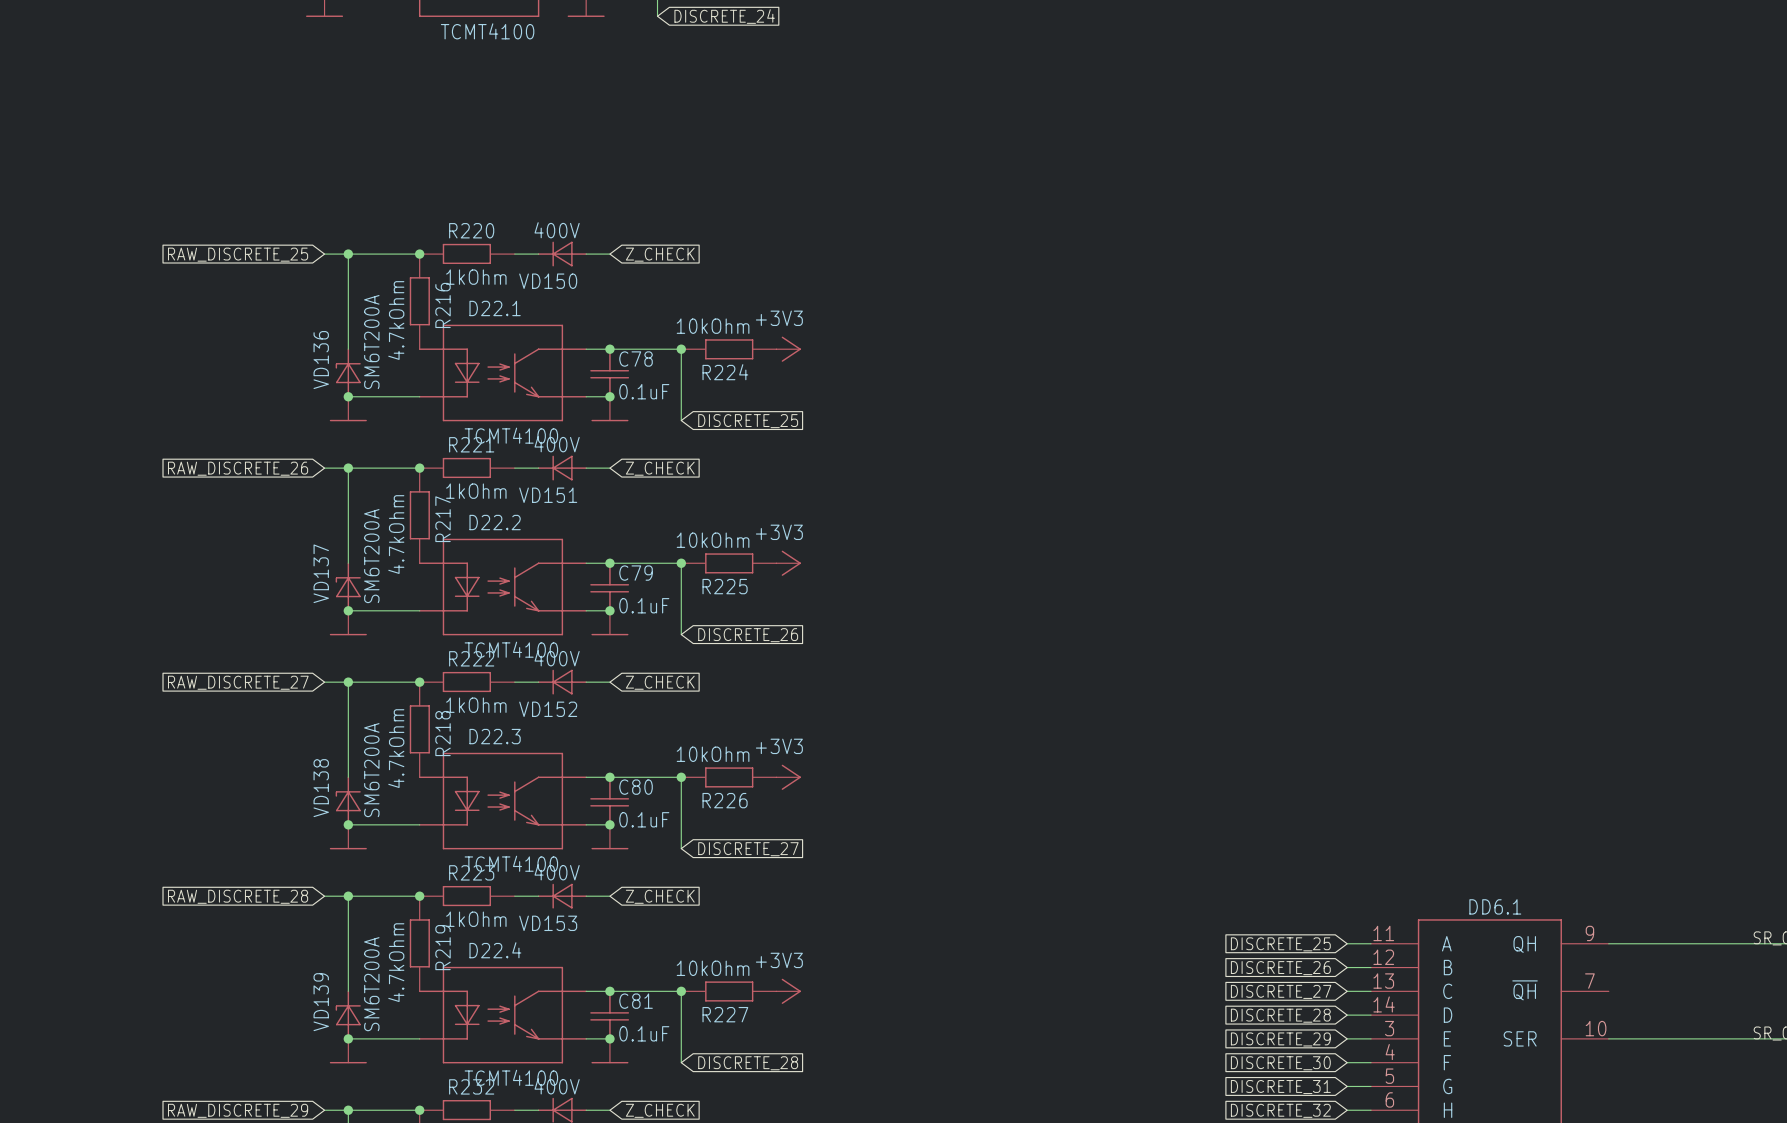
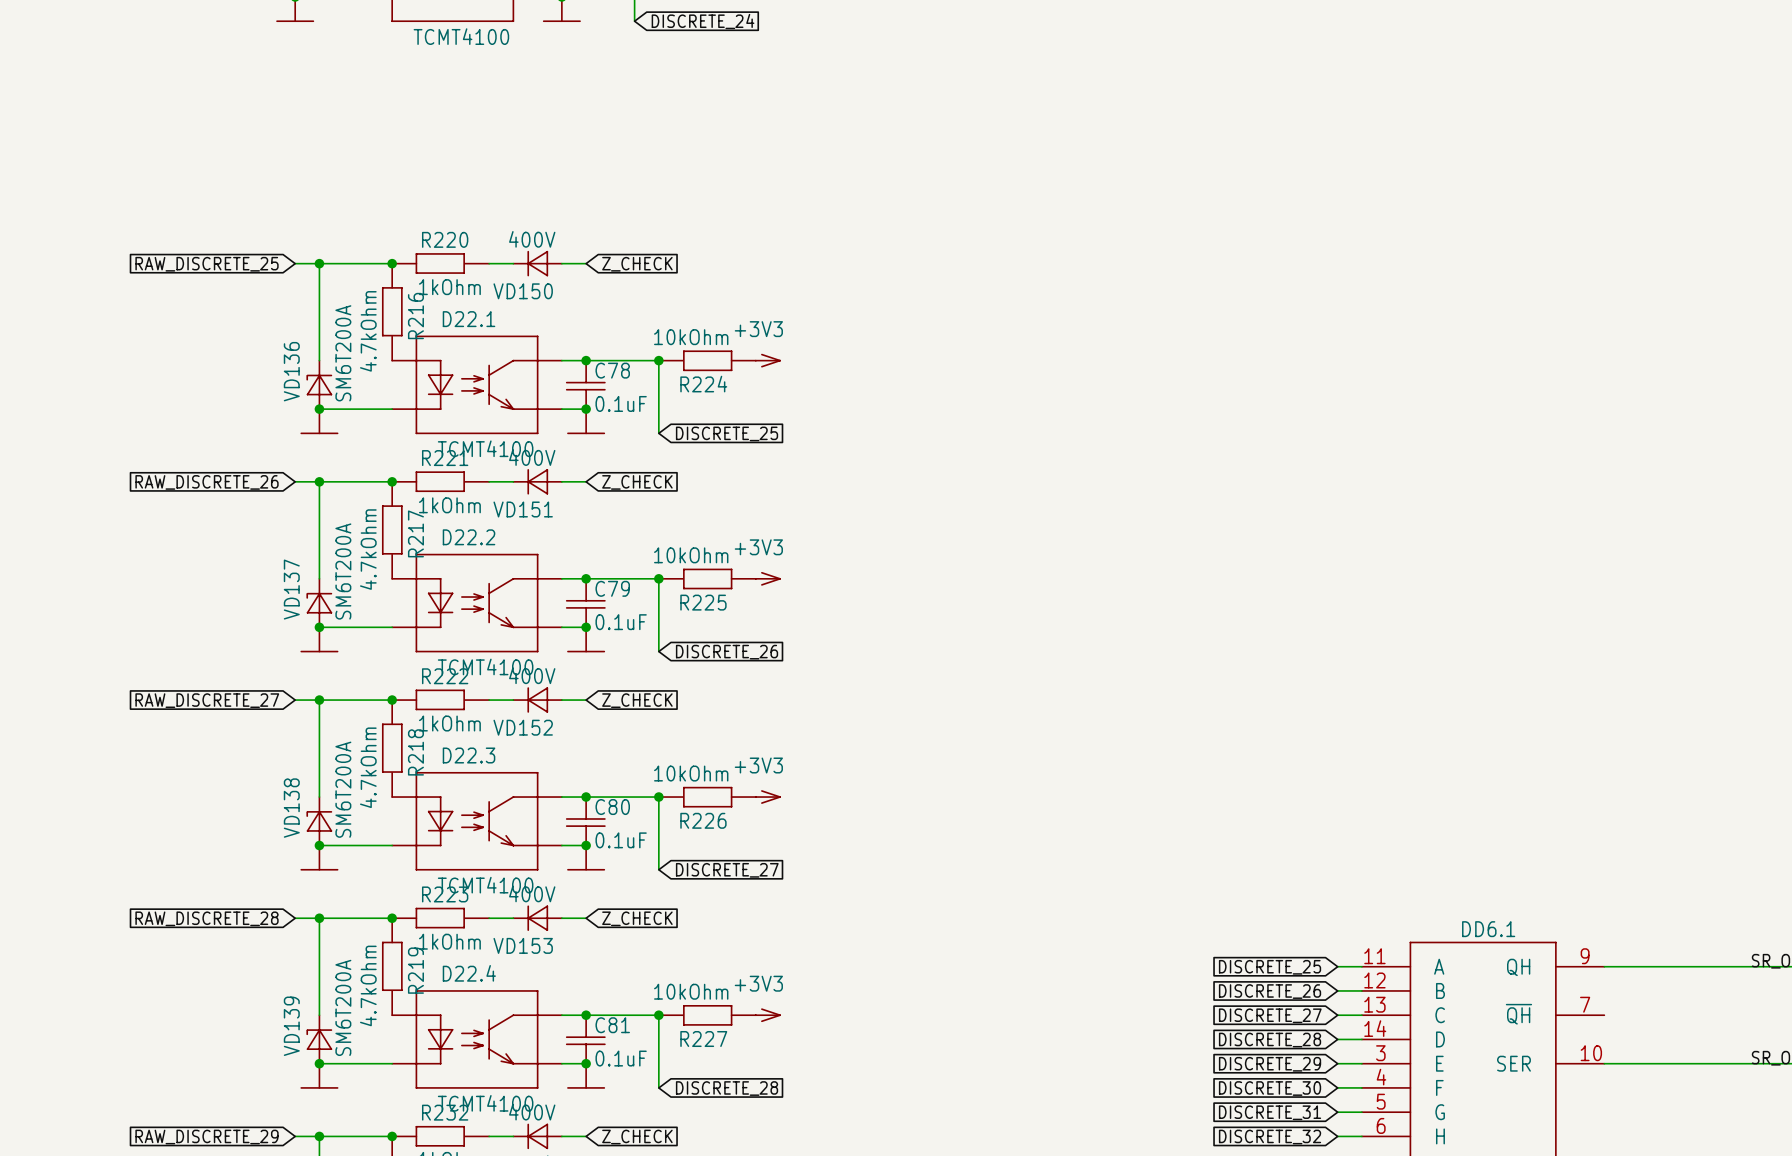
power symbol shape: [776, 336, 801, 362] -> [755, 353, 781, 368]
power symbol shape: [776, 550, 801, 576] -> [755, 572, 781, 586]
power symbol shape: [776, 764, 801, 790] -> [755, 790, 781, 804]
power symbol shape: [776, 978, 801, 1004] -> [755, 1008, 781, 1023]

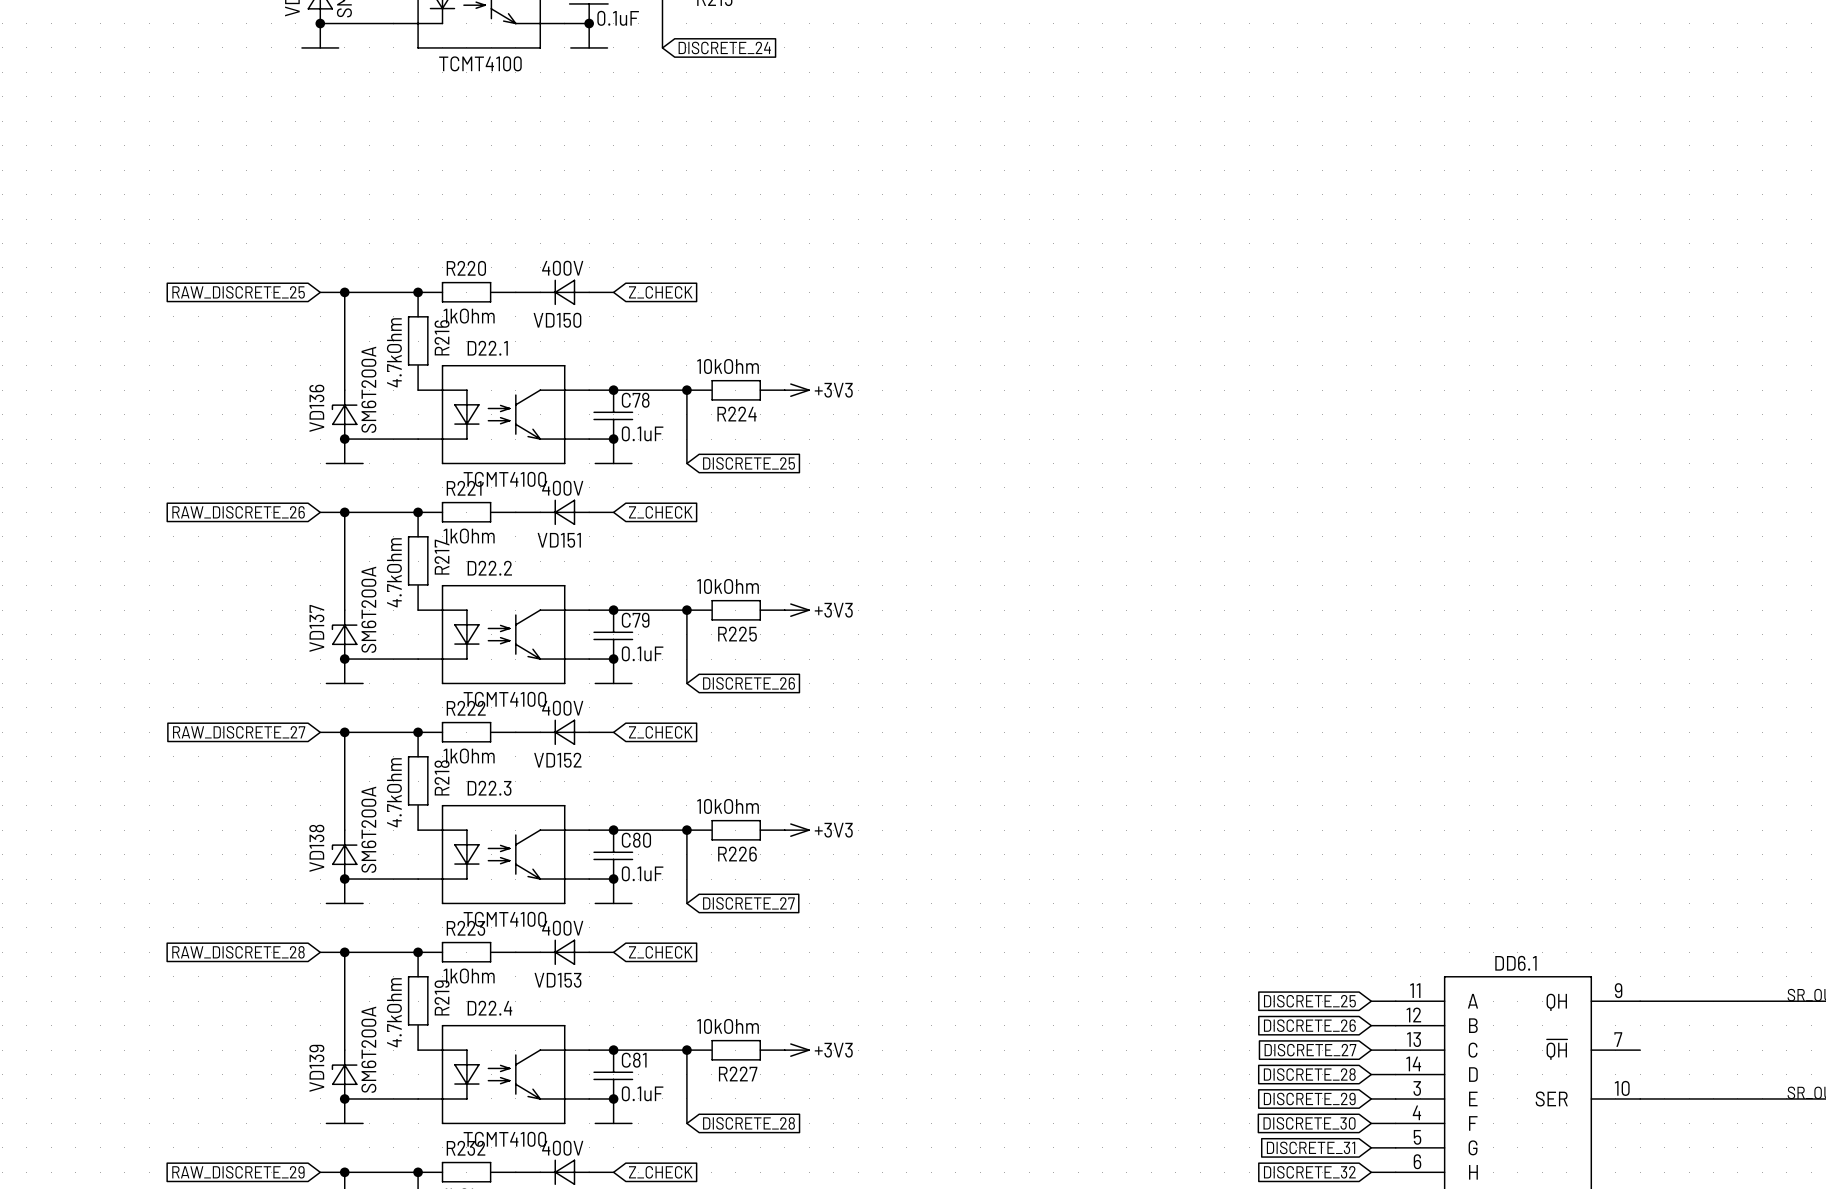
power symbol text position: +3V3 (758, 329) -> +3V3 (833, 390)
power symbol text position: +3V3 (758, 547) -> +3V3 (833, 610)
power symbol text position: +3V3 (758, 765) -> +3V3 (833, 830)
power symbol text position: +3V3 (758, 983) -> +3V3 (833, 1050)

